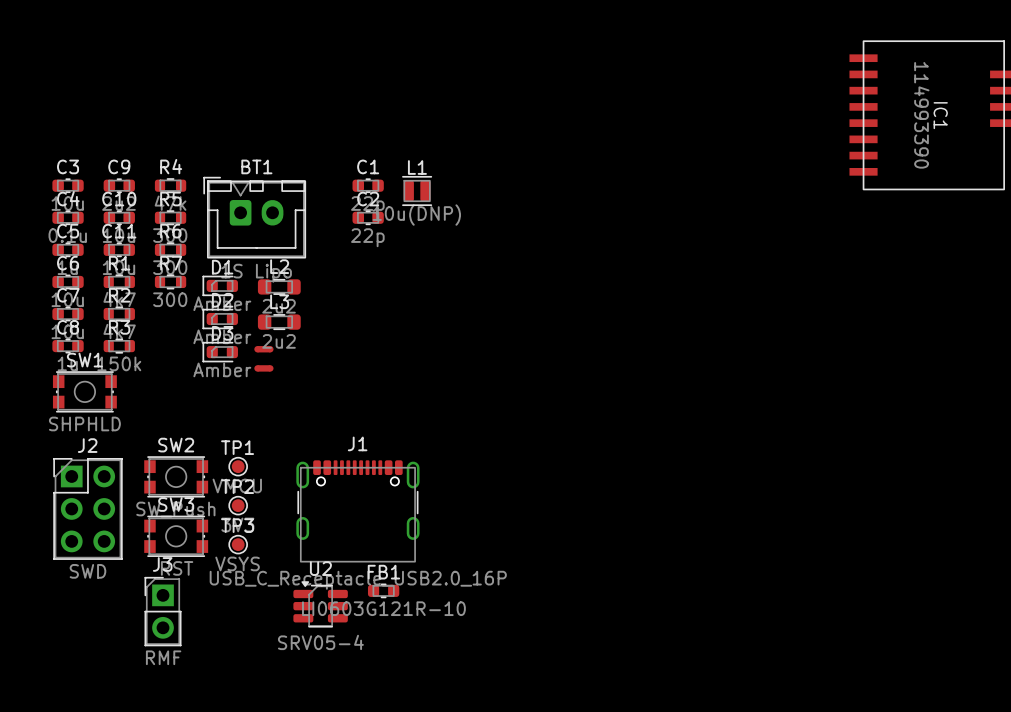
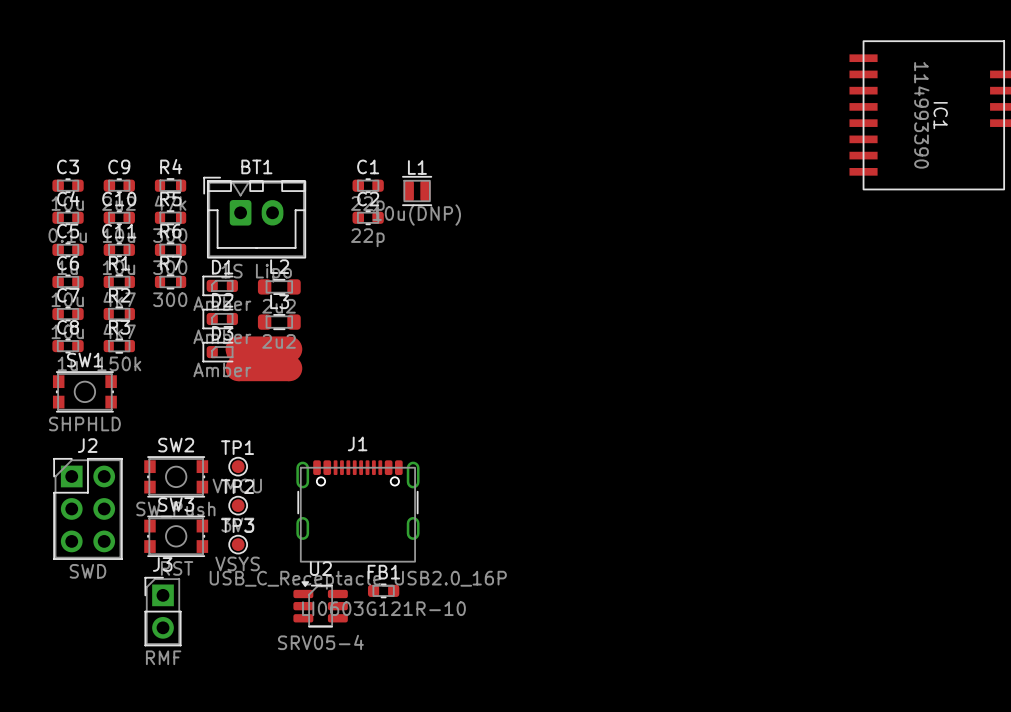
part footprint: [254, 346, 274, 353] -> [225, 336, 303, 363]
part footprint: [254, 365, 274, 372] -> [225, 355, 303, 382]

